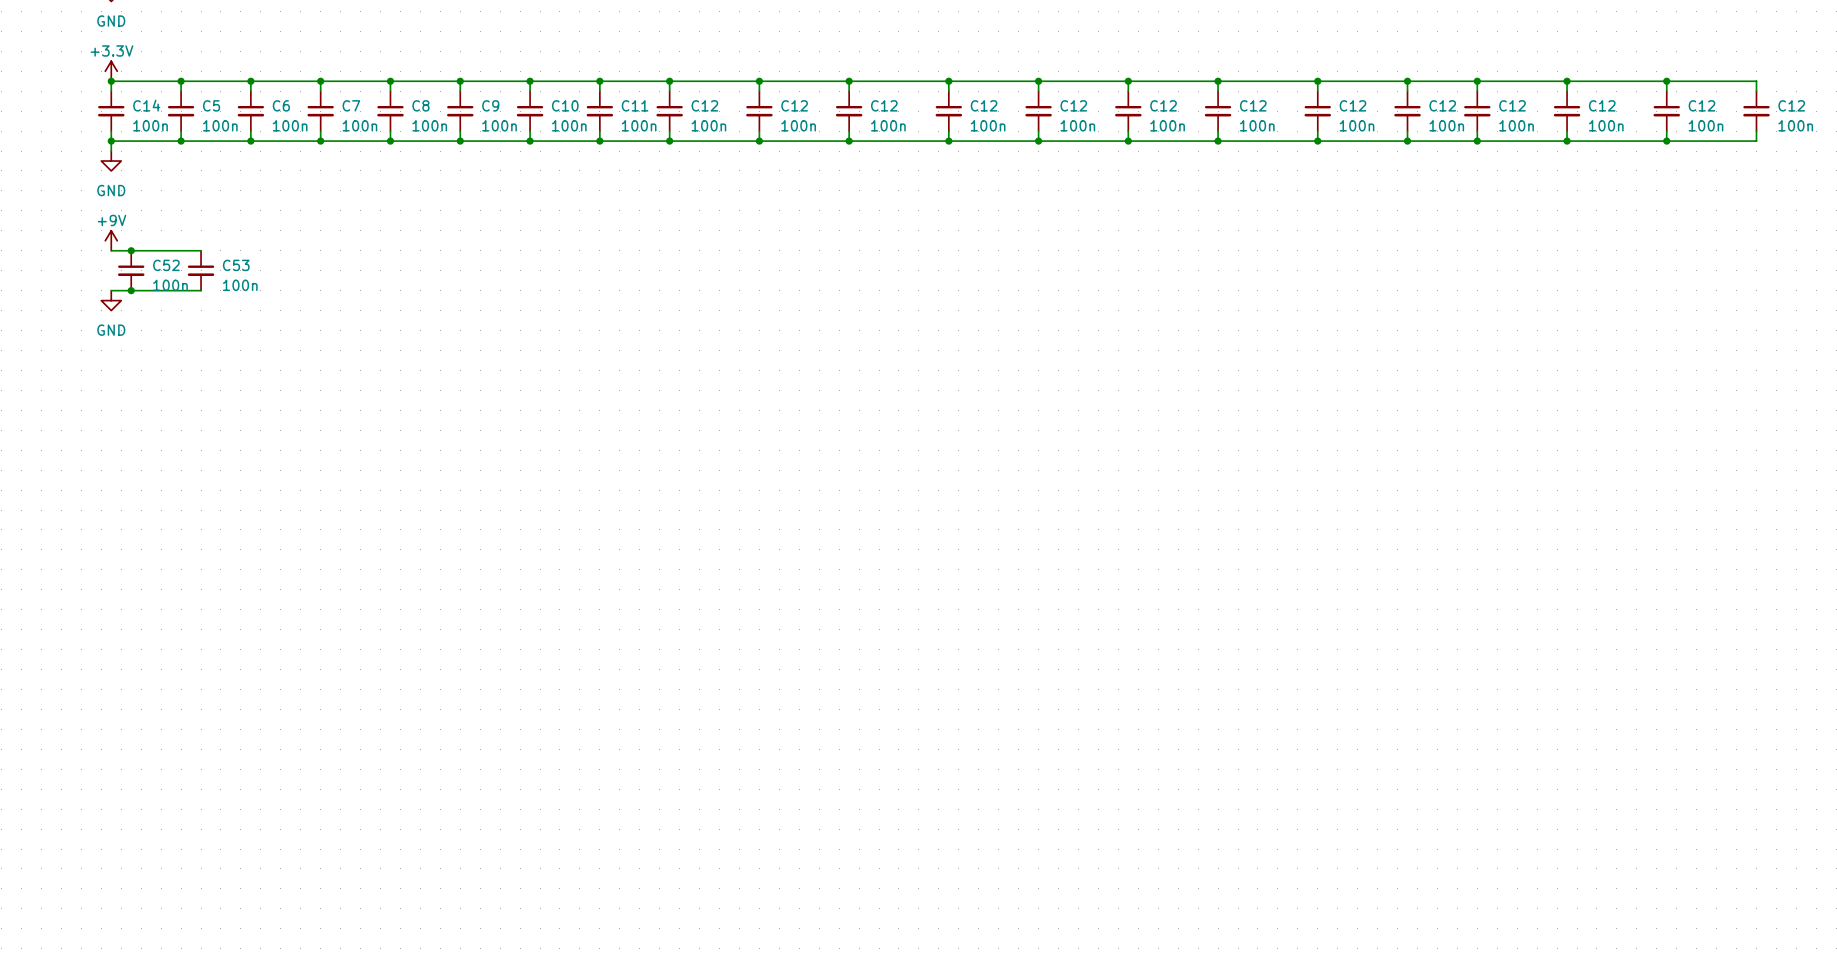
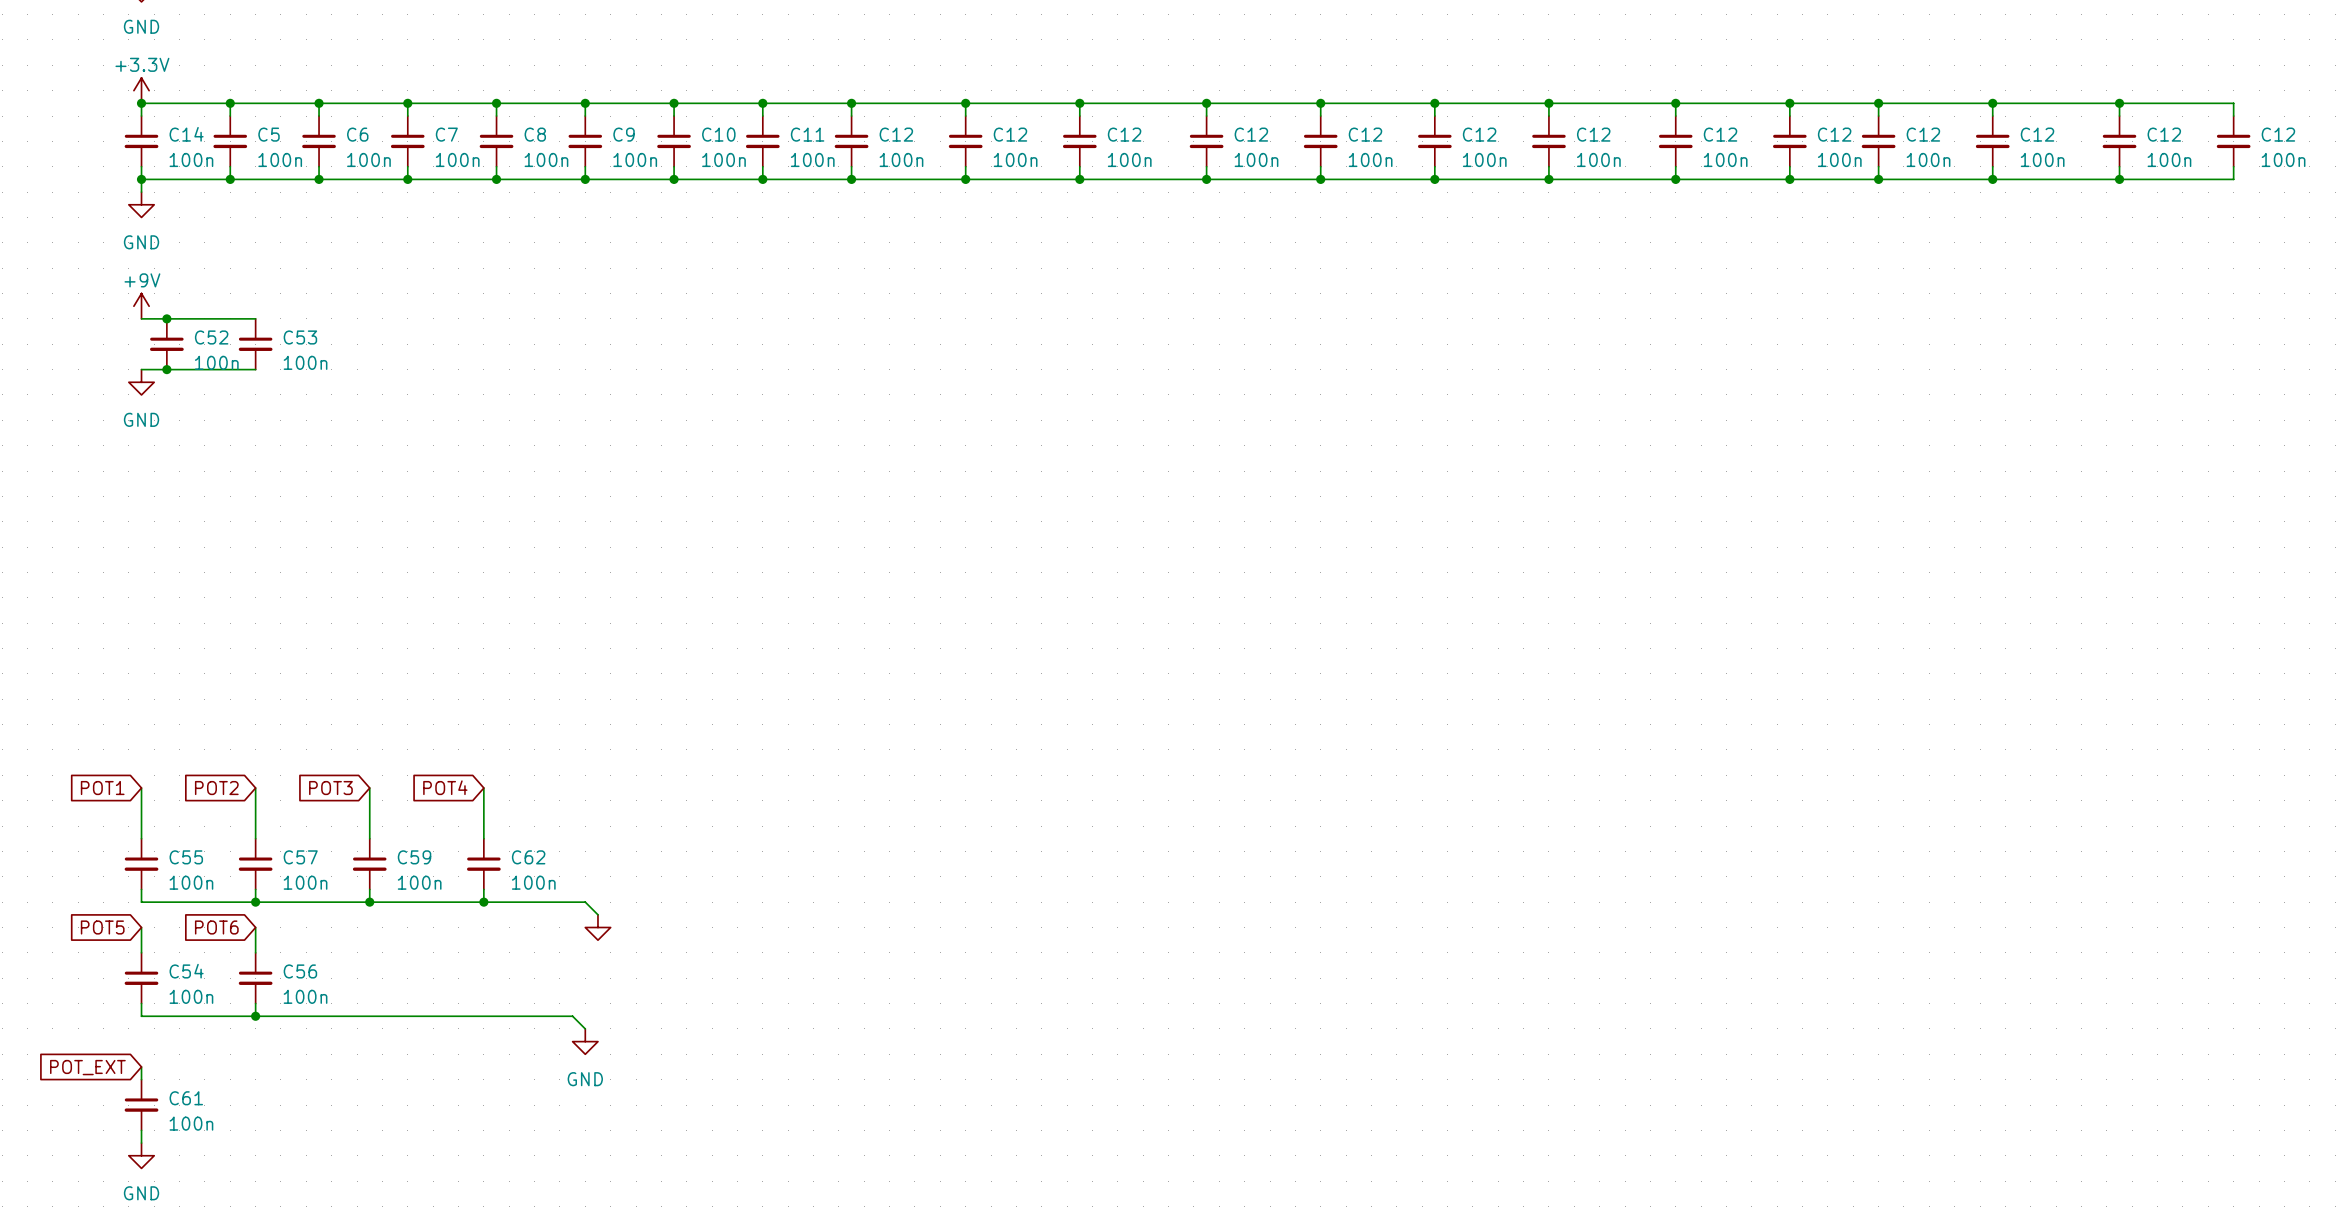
global label: none -> POT1 (102, 788)
wire: none -> (141, 788) (141, 838)
global label: none -> POT2 (216, 788)
wire: none -> (255, 788) (255, 838)
global label: none -> POT3 (330, 788)
wire: none -> (369, 788) (369, 838)
global label: none -> POT4 (445, 787)
wire: none -> (483, 788) (483, 838)
C55: none -> 100n (141, 864)
C57: none -> 100n (255, 864)
C59: none -> 100n (369, 864)
C62: none -> 100n (483, 864)
wire: none -> (141, 889) (141, 902) (585, 902) (597, 914)
wire: none -> (255, 889) (255, 902)
wire: none -> (369, 889) (369, 902)
wire: none -> (483, 889) (483, 902)
junction: none -> (255, 902)
junction: none -> (369, 902)
junction: none -> (483, 902)
global label: none -> POT5 (102, 927)
wire: none -> (141, 927) (141, 952)
global label: none -> POT6 (216, 927)
wire: none -> (255, 927) (255, 952)
power symbol: none -> (597, 927)
C54: none -> 100n (141, 978)
C56: none -> 100n (255, 978)
wire: none -> (141, 1003) (141, 1016) (572, 1016) (585, 1028)
wire: none -> (255, 1003) (255, 1016)
junction: none -> (255, 1016)
power symbol: none -> GND (585, 1041)
global label: none -> POT_EXT (87, 1067)
wire: none -> (141, 1066) (141, 1079)
C61: none -> 100n (141, 1105)
wire: none -> (141, 1130) (141, 1143)
power symbol: none -> GND (141, 1155)

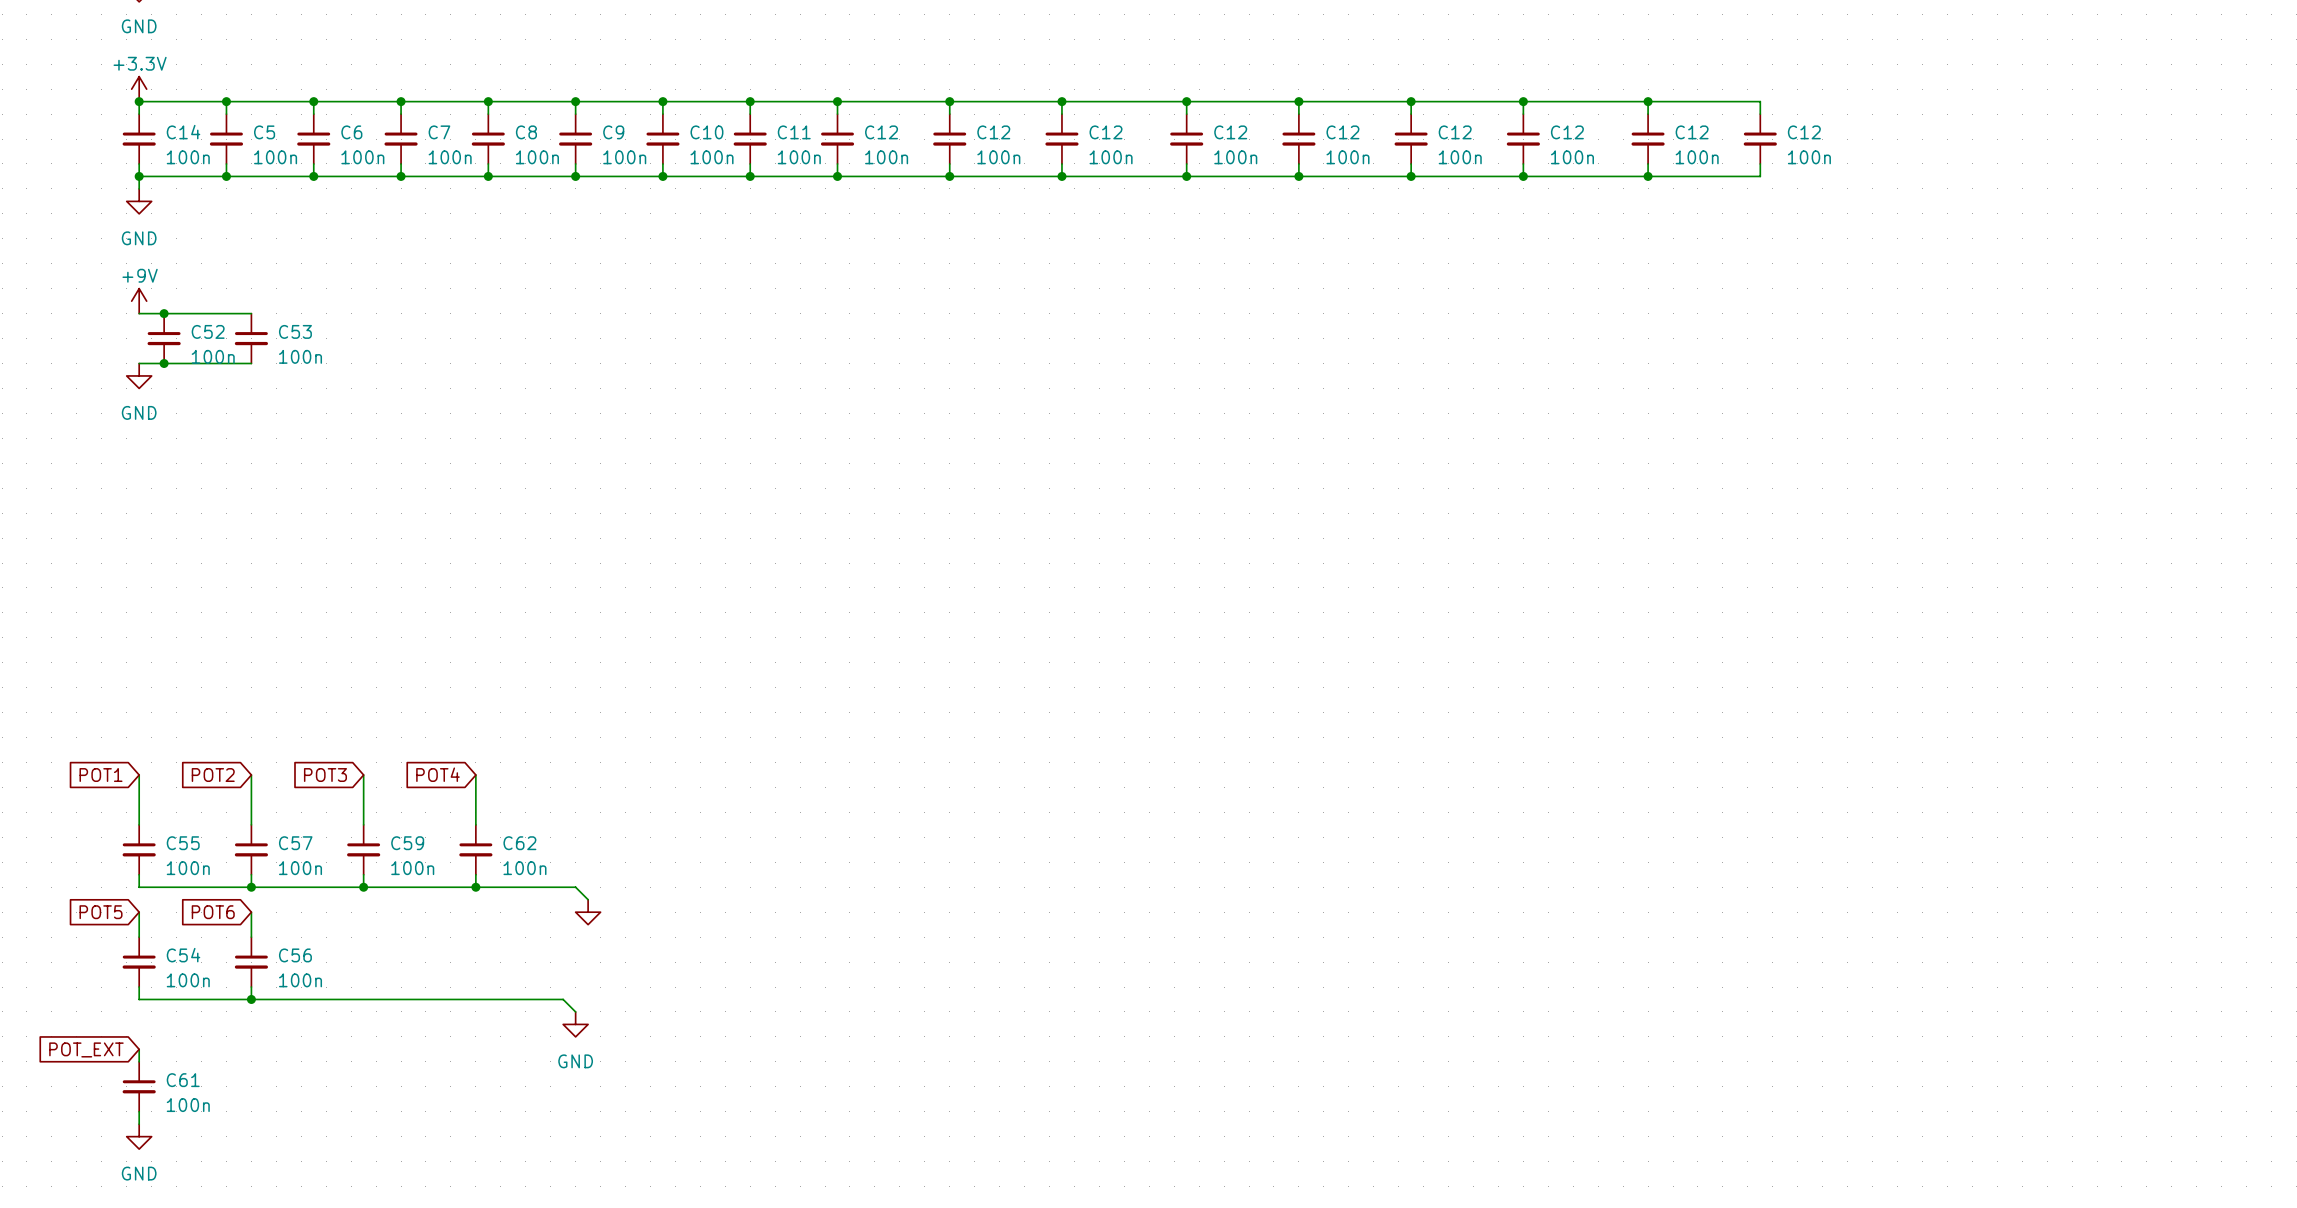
wire: (1789, 103) (2233, 103) (2233, 116) -> none
junction: (1789, 103) -> none
wire: (1878, 103) (1878, 116) -> none
junction: (1878, 103) -> none
wire: (1992, 103) (1992, 116) -> none
junction: (1992, 103) -> none
wire: (2119, 103) (2119, 116) -> none
junction: (2119, 103) -> none
C12: 100n (1878, 141) -> none
C12: 100n (1992, 141) -> none
C12: 100n (2119, 141) -> none
C12: 100n (2233, 141) -> none
wire: (1878, 166) (1878, 179) -> none
wire: (1992, 166) (1992, 179) -> none
wire: (2119, 166) (2119, 179) -> none
wire: (2233, 166) (2233, 179) (1789, 179) -> none
junction: (1789, 179) -> none
junction: (1878, 179) -> none
junction: (1992, 179) -> none
junction: (2119, 179) -> none

